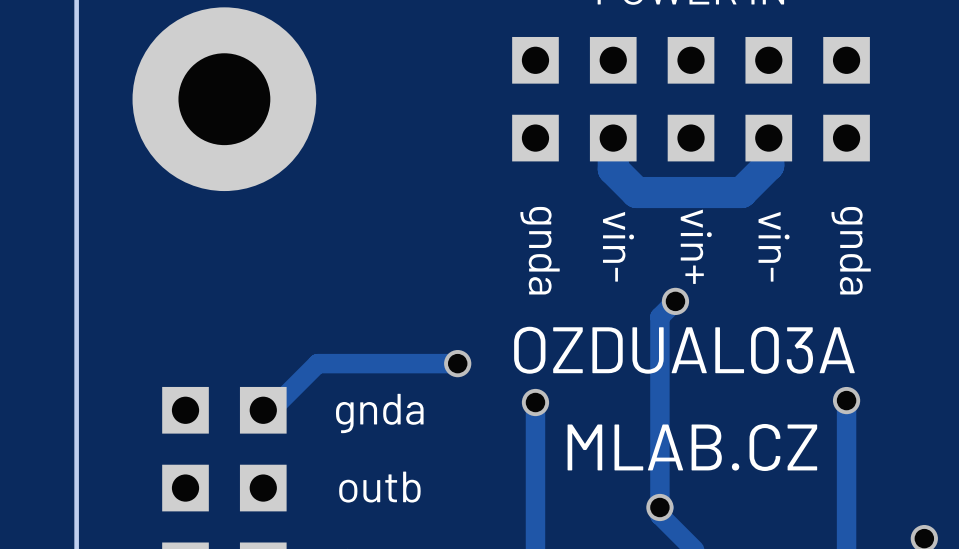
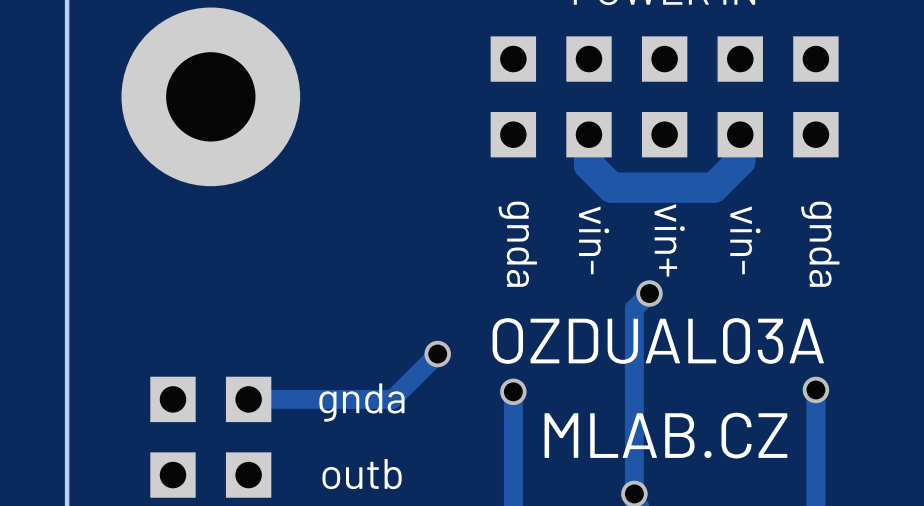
track: (457, 363) (317, 363) (271, 410) -> (437, 354) (392, 399) (256, 399)

